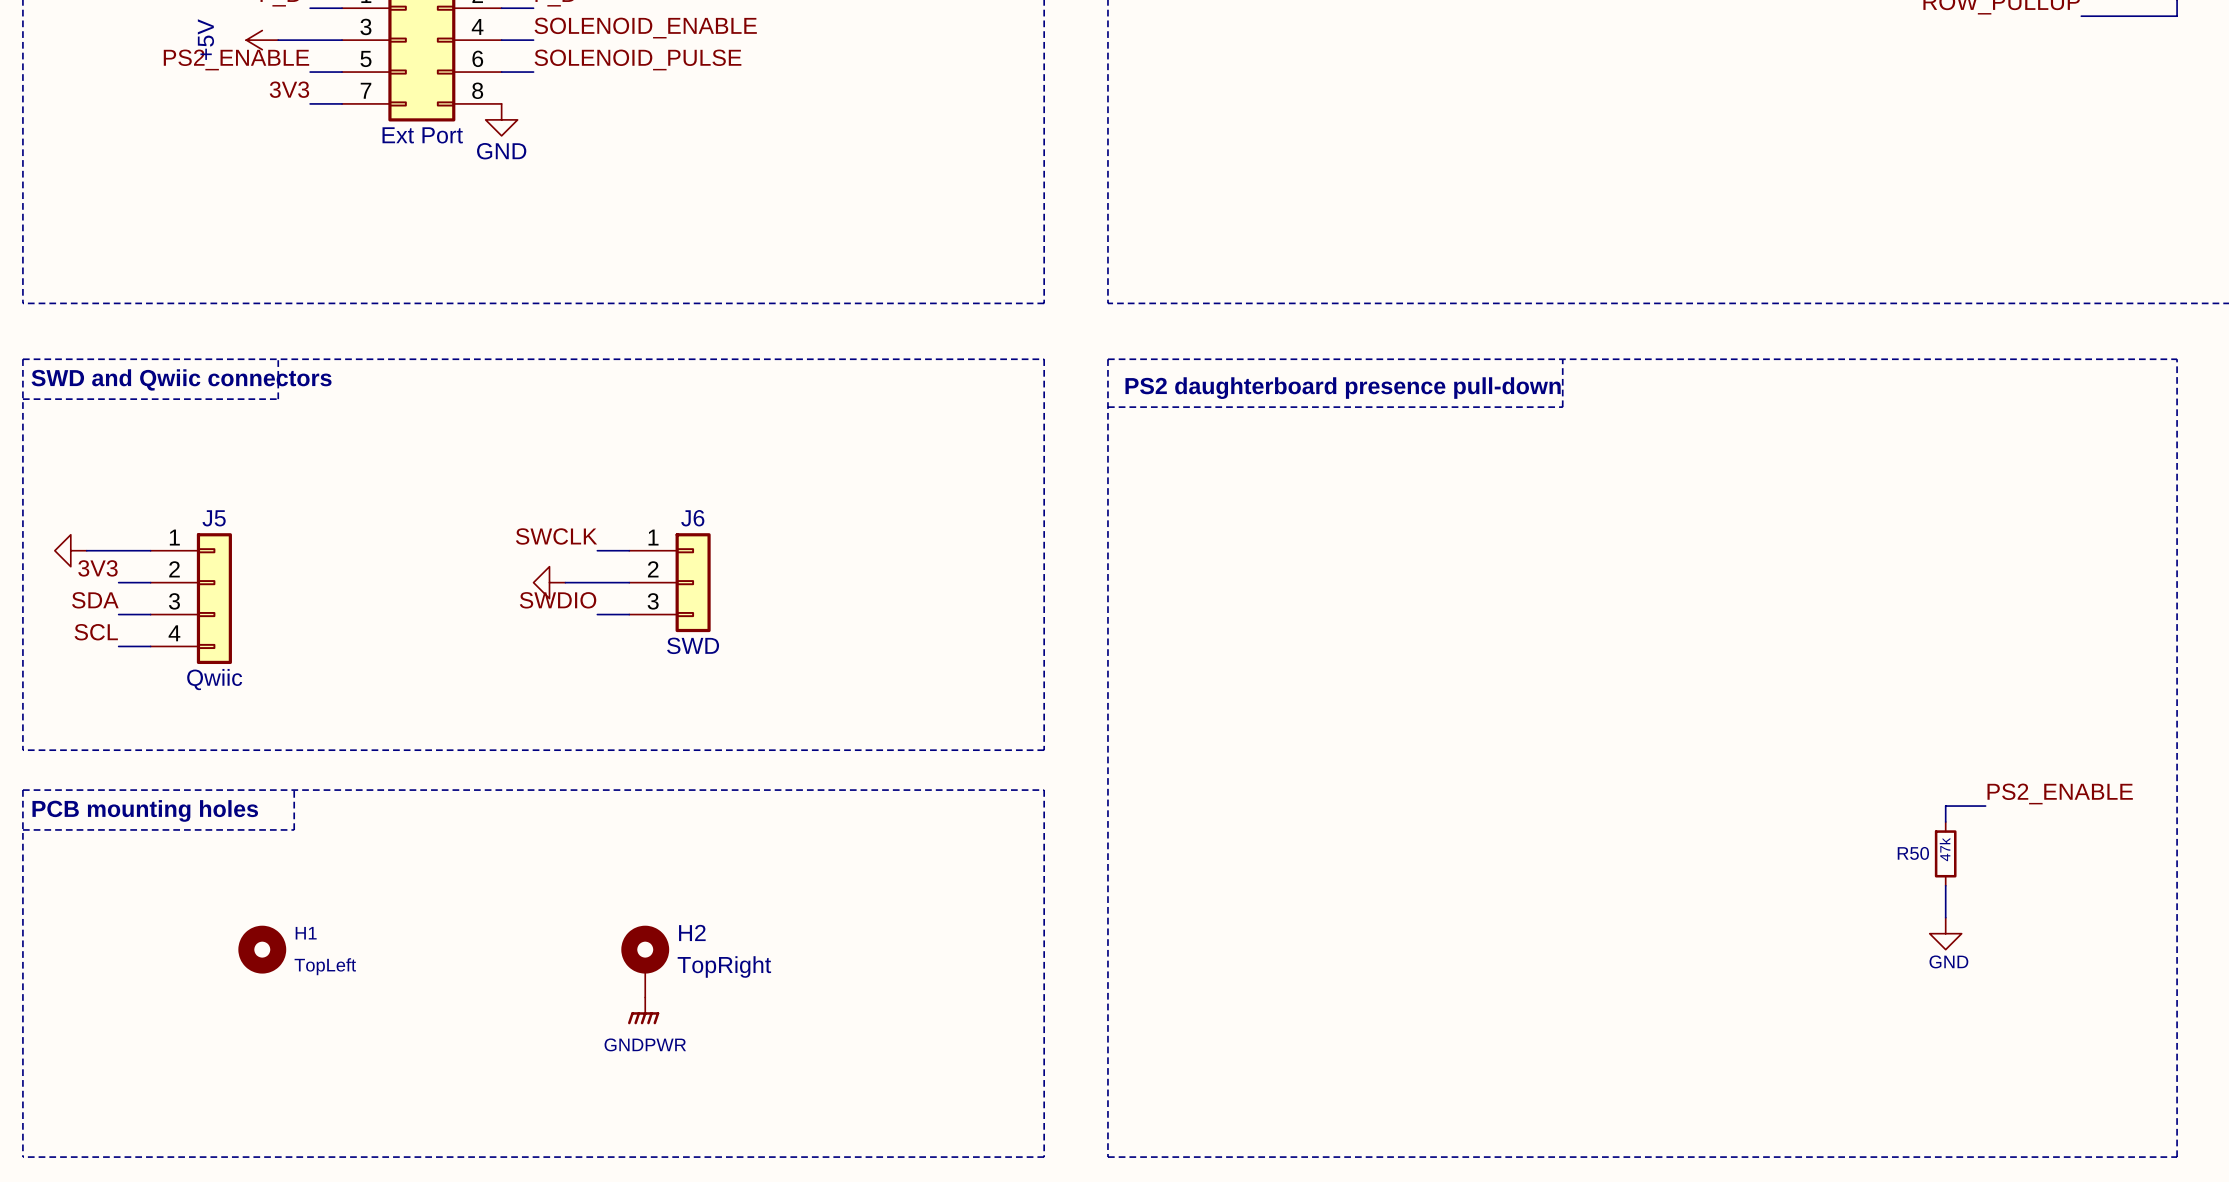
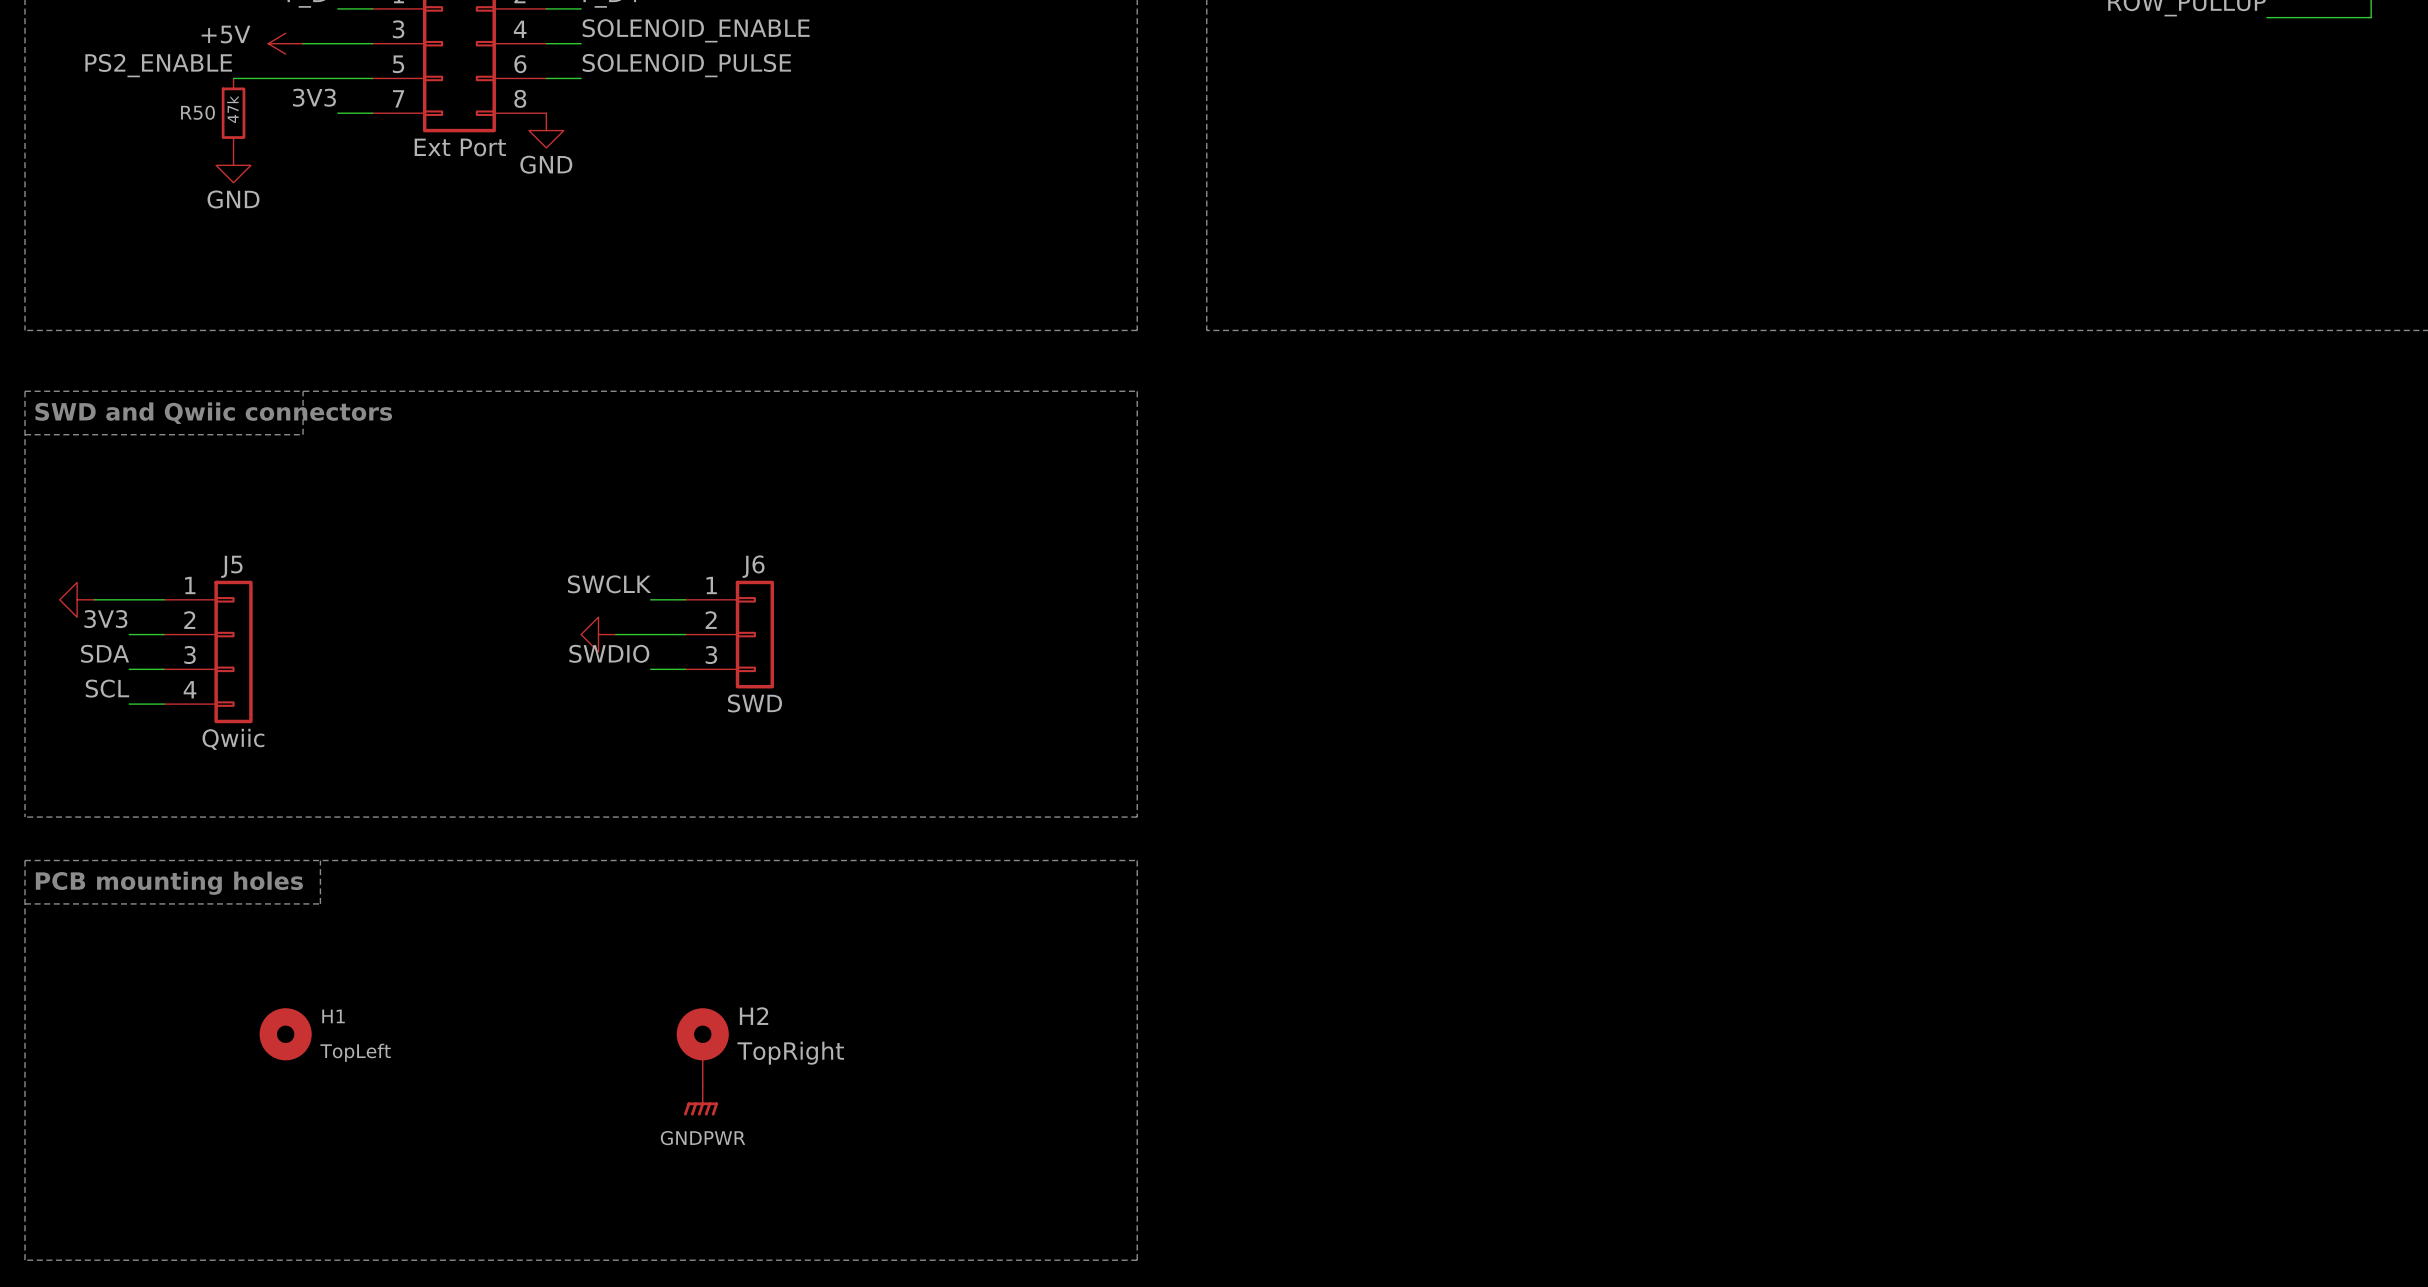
power symbol text rotation: 0° (205, 39) -> 90° clockwise (226, 34)
label position: PS2_ENABLE (236, 59) -> PS2_ENABLE (158, 65)
wire: none -> (233, 78) (337, 78)
power symbol: none -> GND (233, 165)
line: (1107, 359) (1107, 1157) (2177, 1157) (2177, 359) (1107, 359) -> none
line: (1562, 359) (1562, 407) (1107, 407) -> none
text: PS2 daughterboard presence pull-down (1343, 388) -> none
label: PS2_ENABLE (2060, 793) -> none
wire: (1985, 806) (1945, 806) (1945, 821) -> none
R50 position: (1945, 853) -> (233, 113)
wire: (1945, 885) (1945, 917) -> none
power symbol: GND (1945, 933) -> none

